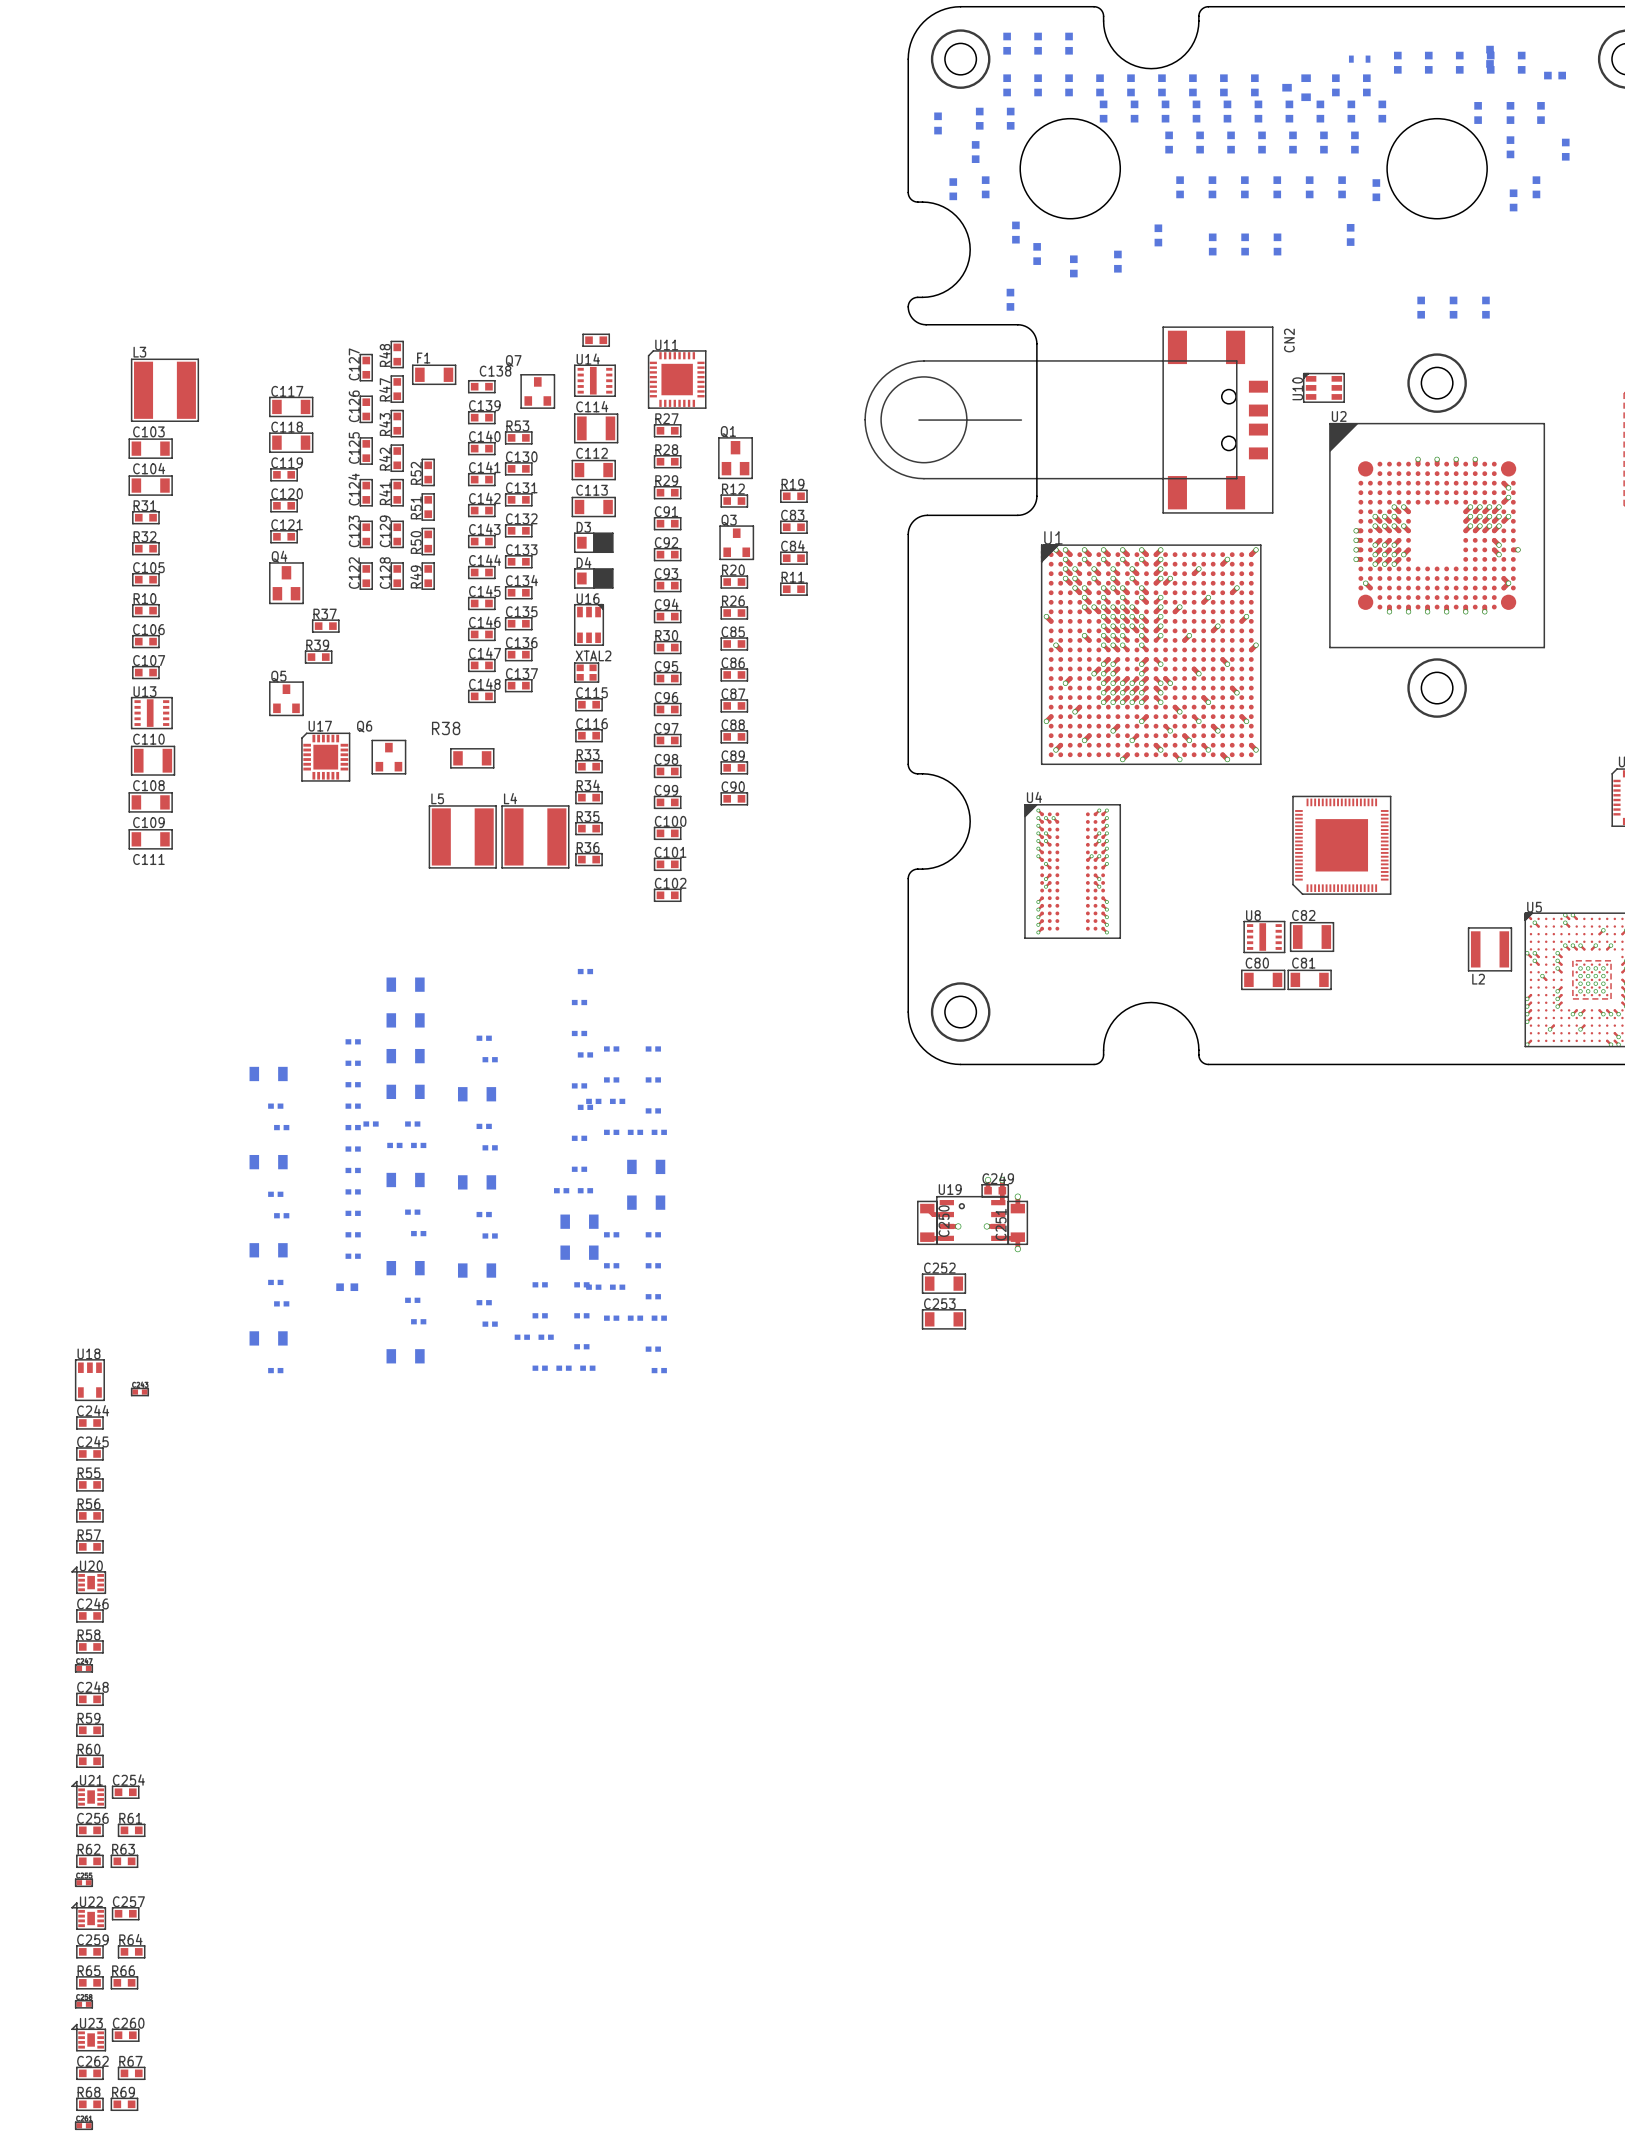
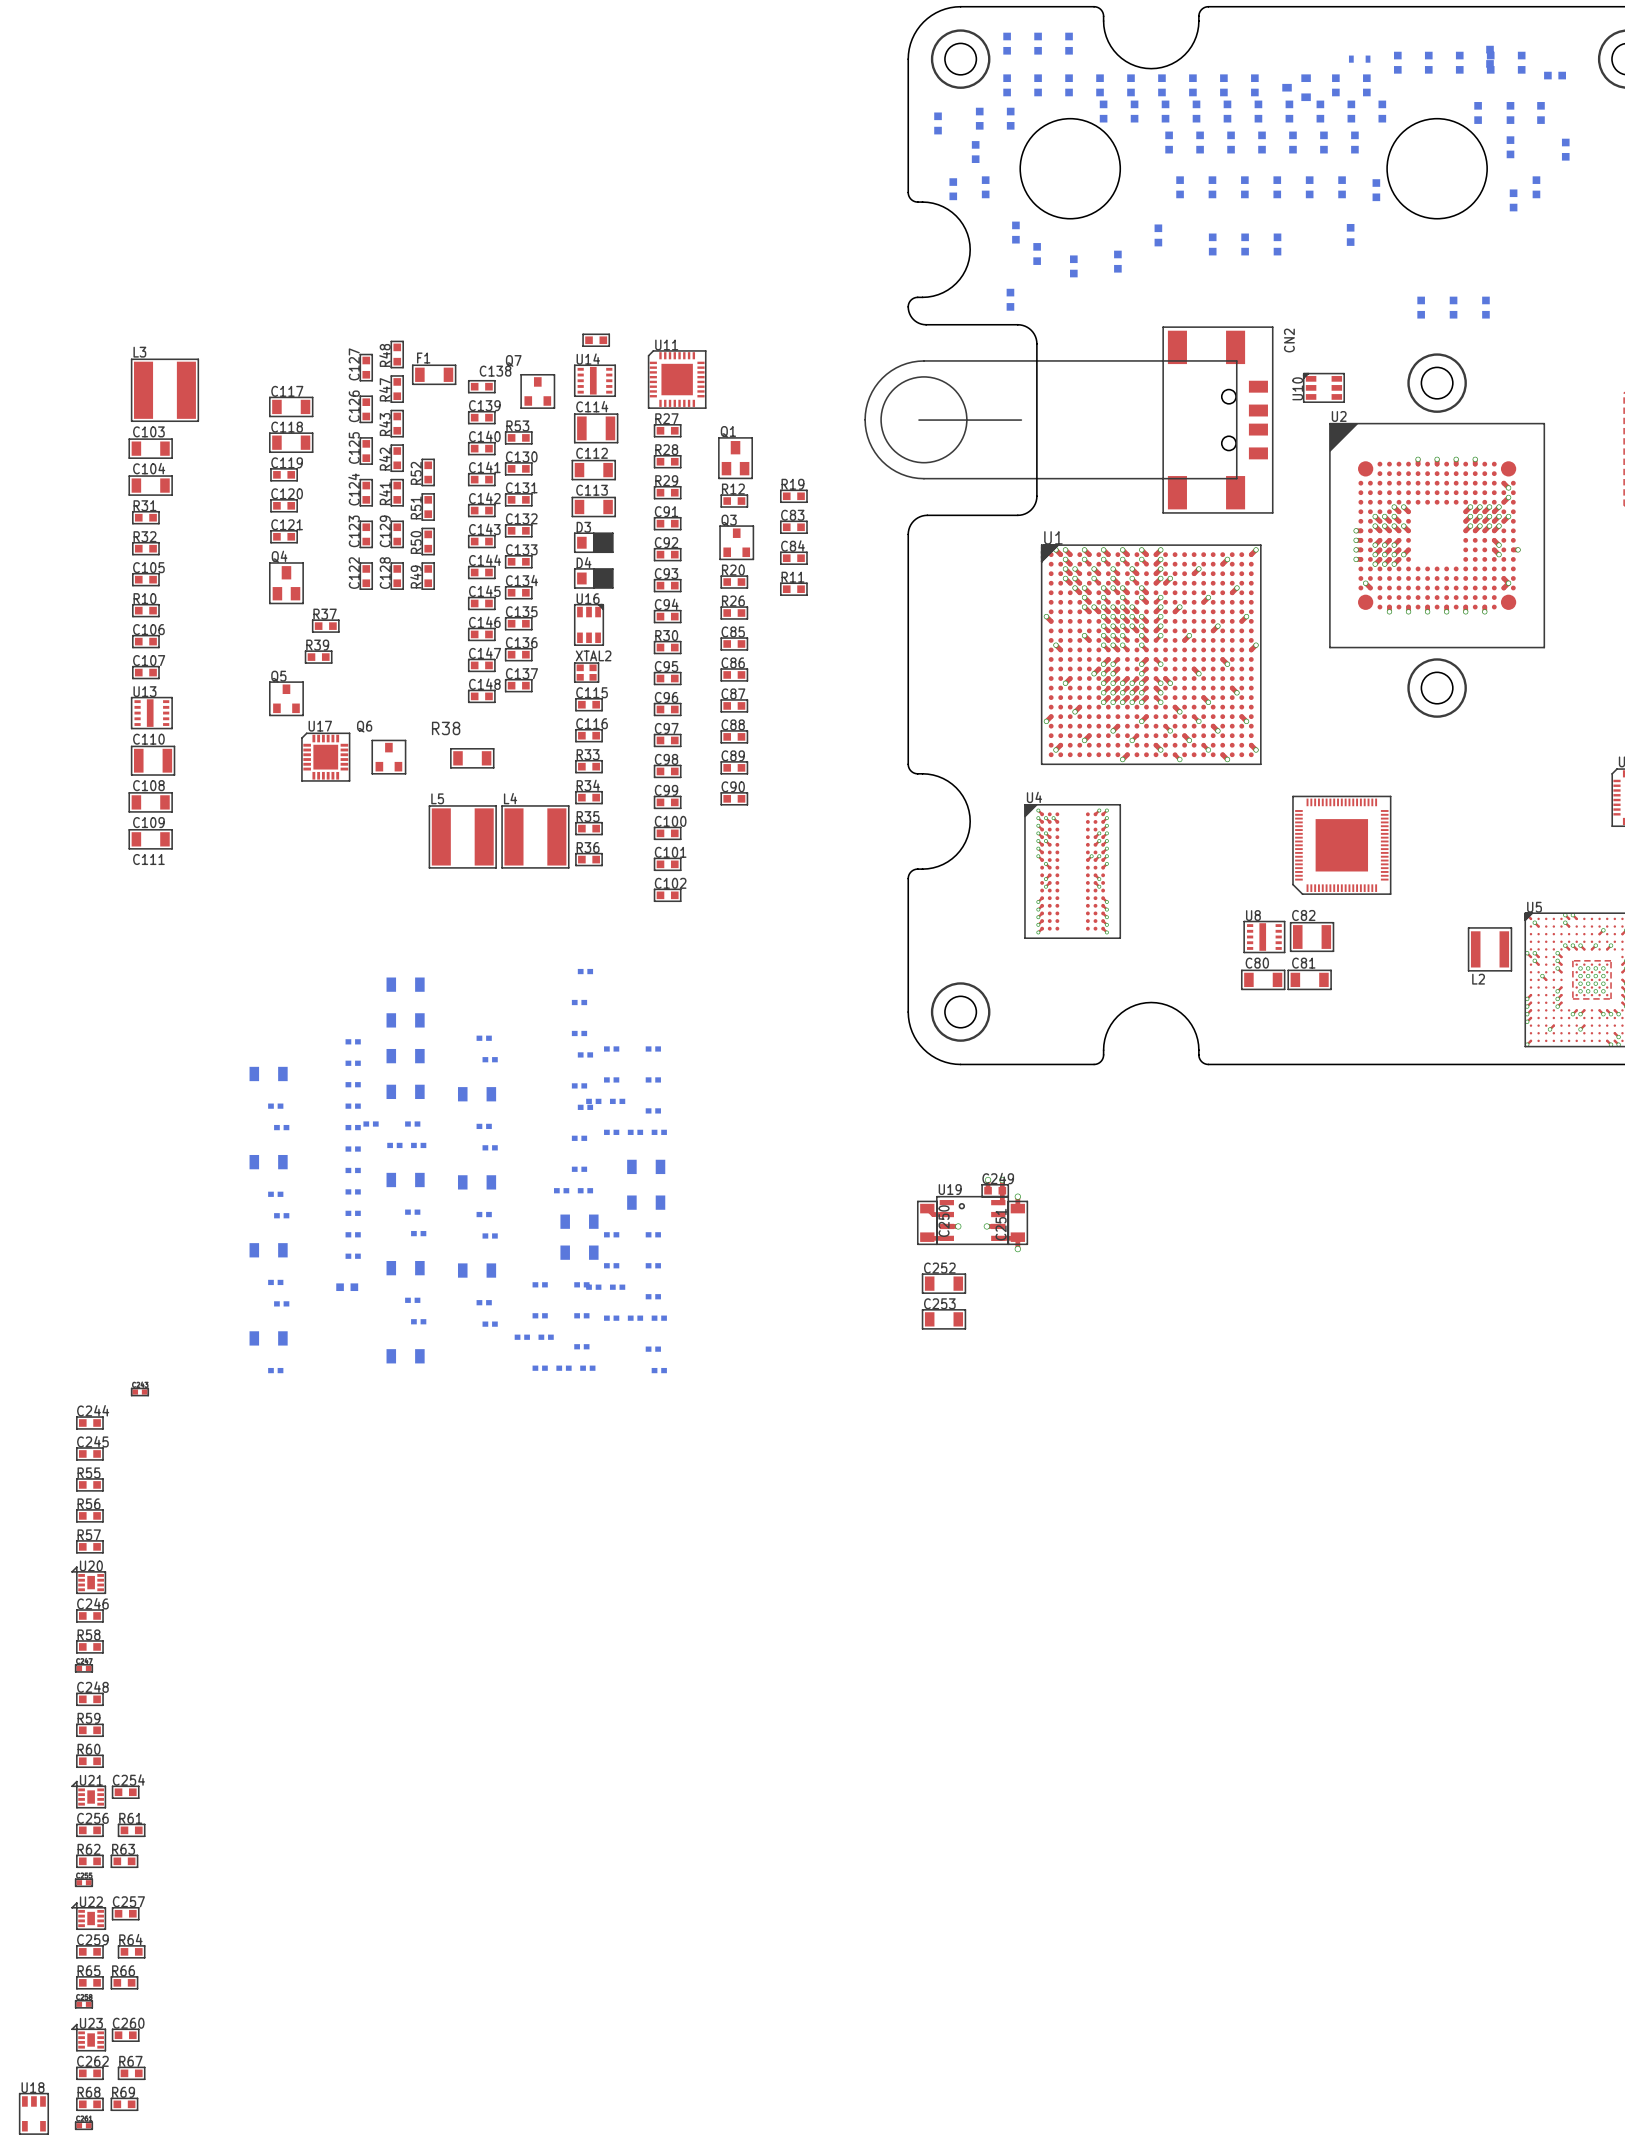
U18 position: (89, 1380) -> (33, 2113)

